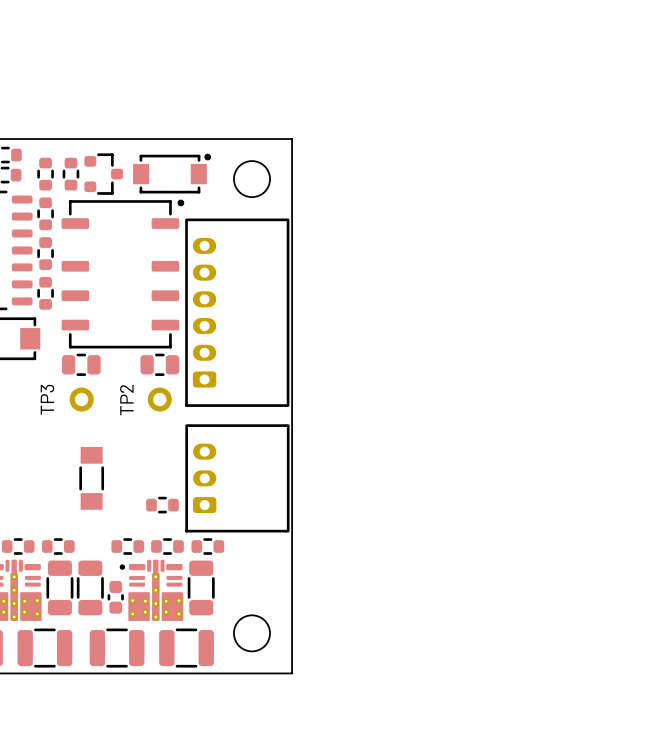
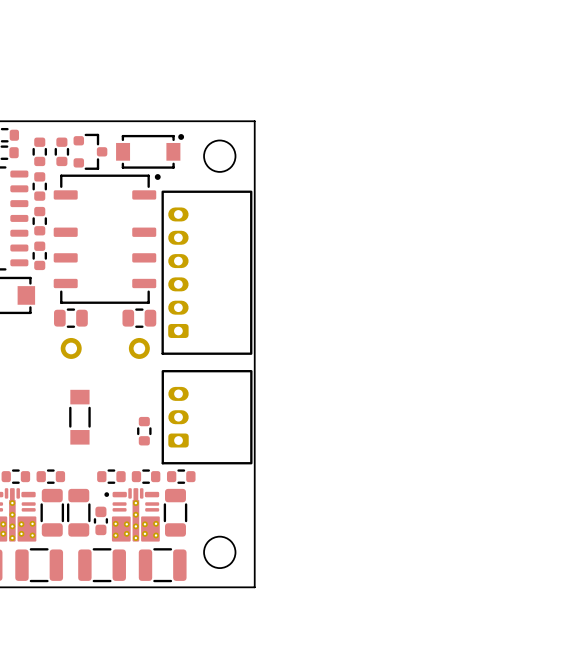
TP3 name: TP3 (47, 399) -> none
TP2 name: TP2 (126, 400) -> none
part rotation: 0° (162, 505) -> 90° clockwise (144, 431)

